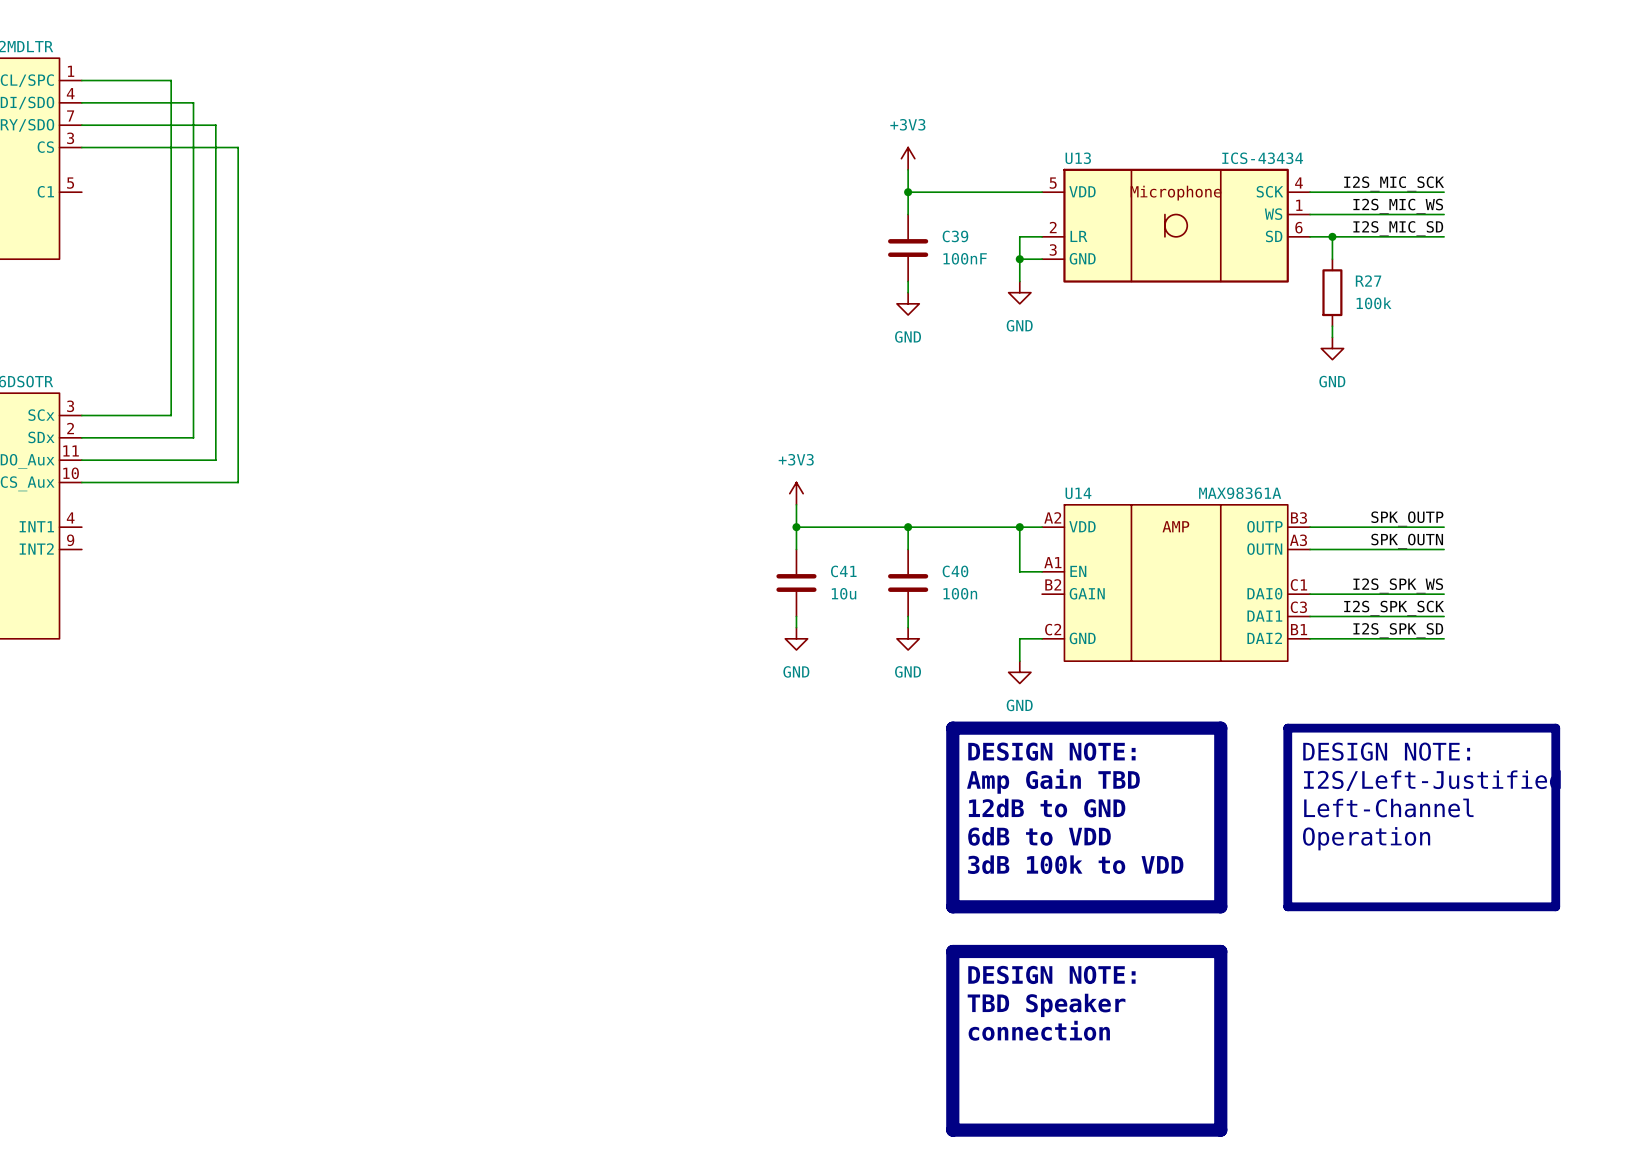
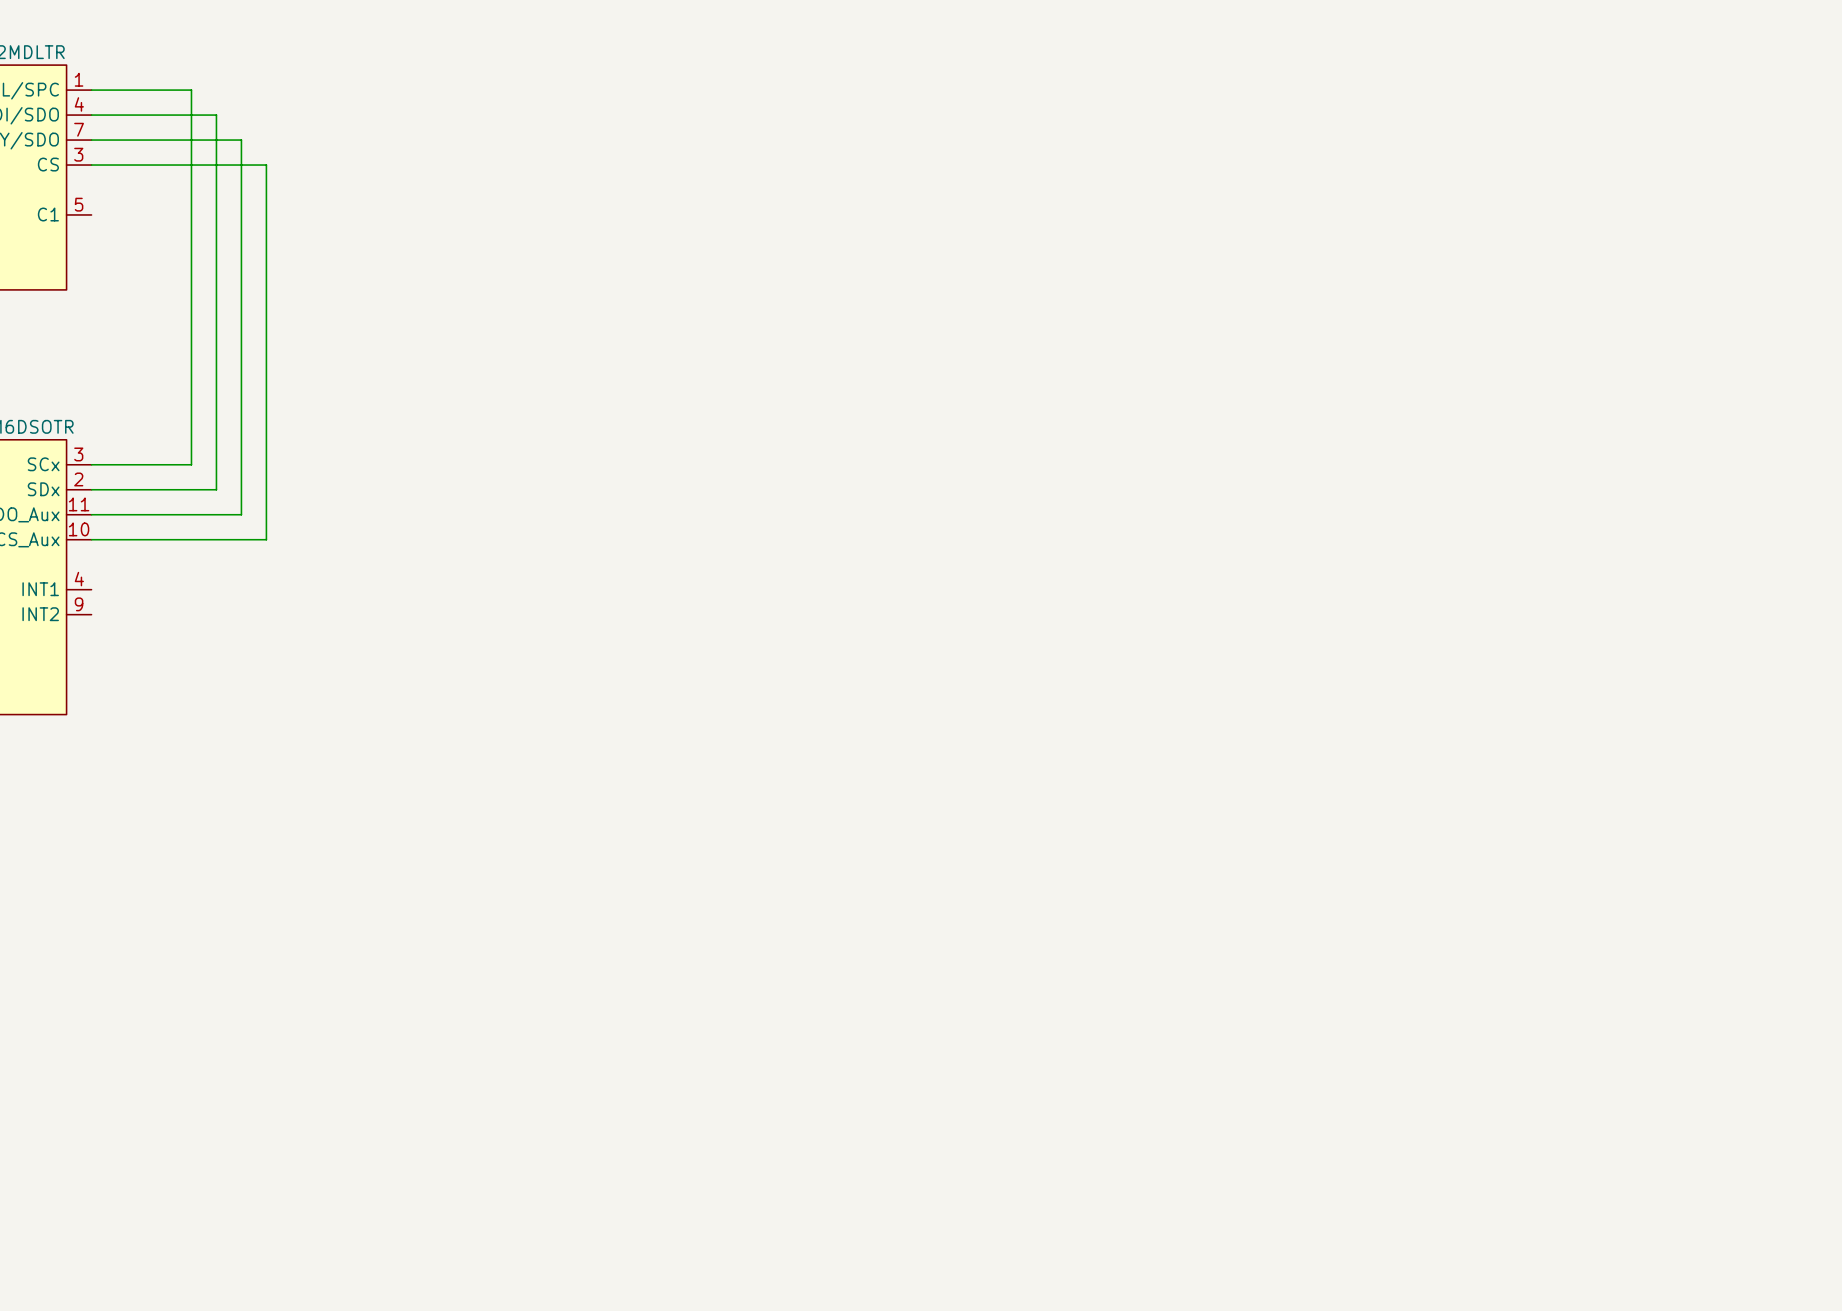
power symbol: +3V3 (908, 158) -> none
wire: (908, 169) (908, 214) -> none
label: I2S_MIC_SCK (1394, 183) -> none
wire: (908, 192) (1042, 192) -> none
junction: (908, 192) -> none
wire: (1310, 192) (1444, 192) -> none
label: I2S_MIC_WS (1398, 206) -> none
wire: (1310, 214) (1444, 214) -> none
U13: ICS-43434 (1176, 225) -> none
label: I2S_MIC_SD (1398, 228) -> none
wire: (1042, 236) (1019, 236) (1019, 281) -> none
wire: (1310, 236) (1444, 236) -> none
wire: (1332, 236) (1332, 259) -> none
junction: (1332, 236) -> none
C39: 100nF (908, 248) -> none
wire: (1019, 259) (1042, 259) -> none
junction: (1019, 259) -> none
wire: (908, 281) (908, 292) -> none
power symbol: GND (1019, 292) -> none
R27: 100k (1332, 292) -> none
power symbol: GND (908, 303) -> none
wire: (1332, 326) (1332, 337) -> none
power symbol: GND (1332, 348) -> none
power symbol: +3V3 (796, 493) -> none
wire: (796, 504) (796, 549) -> none
label: SPK_OUTP (1407, 518) -> none
wire: (796, 527) (1042, 527) -> none
junction: (796, 527) -> none
wire: (908, 527) (908, 549) -> none
junction: (908, 527) -> none
wire: (1019, 527) (1019, 571) (1042, 571) -> none
junction: (1019, 527) -> none
wire: (1310, 527) (1444, 527) -> none
label: SPK_OUTN (1407, 541) -> none
wire: (1310, 549) (1444, 549) -> none
C41: 10u (796, 582) -> none
C40: 100n (908, 582) -> none
U14: MAX98361A (1176, 582) -> none
label: I2S_SPK_WS (1398, 585) -> none
wire: (1310, 594) (1444, 594) -> none
label: I2S_SPK_SCK (1394, 608) -> none
wire: (796, 616) (796, 627) -> none
wire: (908, 616) (908, 627) -> none
wire: (1310, 616) (1444, 616) -> none
label: I2S_SPK_SD (1398, 630) -> none
power symbol: GND (796, 638) -> none
power symbol: GND (908, 638) -> none
wire: (1042, 638) (1019, 638) (1019, 661) -> none
wire: (1310, 638) (1444, 638) -> none
power symbol: GND (1019, 672) -> none
line: (952, 728) (1220, 728) (1220, 906) (952, 906) (952, 728) -> none
line: (1287, 728) (1555, 728) (1555, 906) (1287, 906) (1287, 728) -> none
text: DESIGN NOTE: (1051, 751) -> none
text: DESIGN NOTE: (1386, 751) -> none
text: I2S/Left-Justified (1432, 780) -> none
text: Amp Gain TBD (1053, 781) -> none
text: 12dB to GND (1047, 808) -> none
text: Left-Channel (1388, 808) -> none
text: 6dB to VDD (1039, 836) -> none
text: Operation (1366, 838) -> none
text: 3dB 100k to VDD (1075, 864) -> none
line: (952, 951) (952, 1130) (1220, 1130) (1220, 951) (952, 951) -> none
text: DESIGN NOTE: (1051, 974) -> none
text: TBD Speaker (1046, 1005) -> none
text: connection (1039, 1030) -> none

